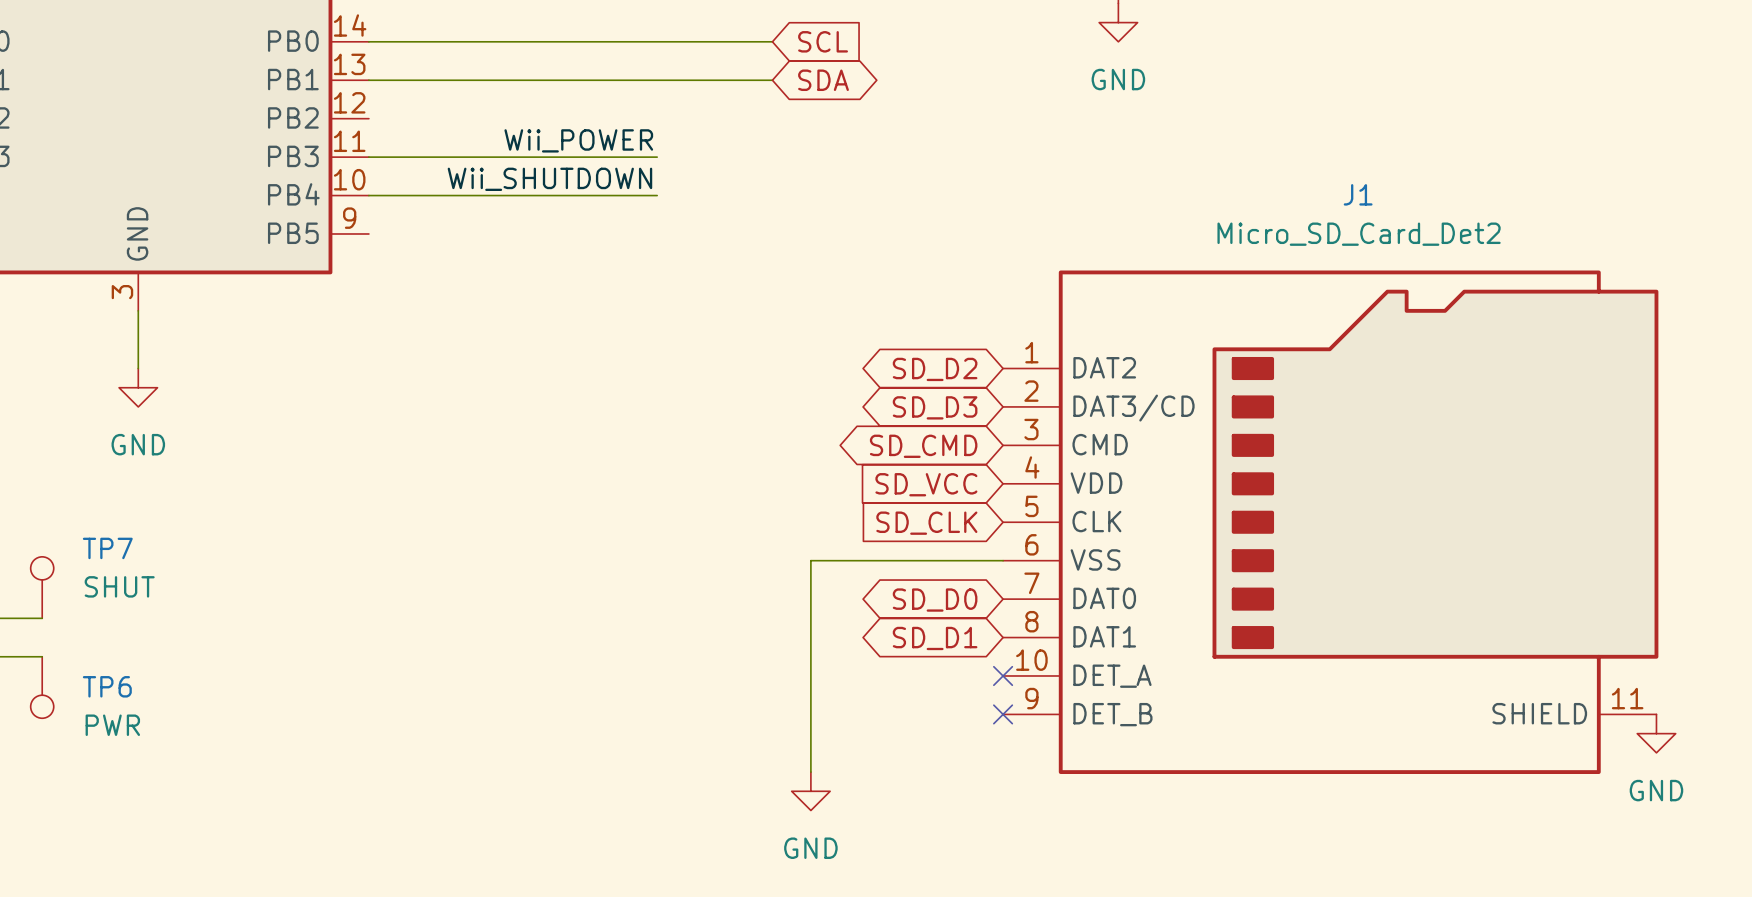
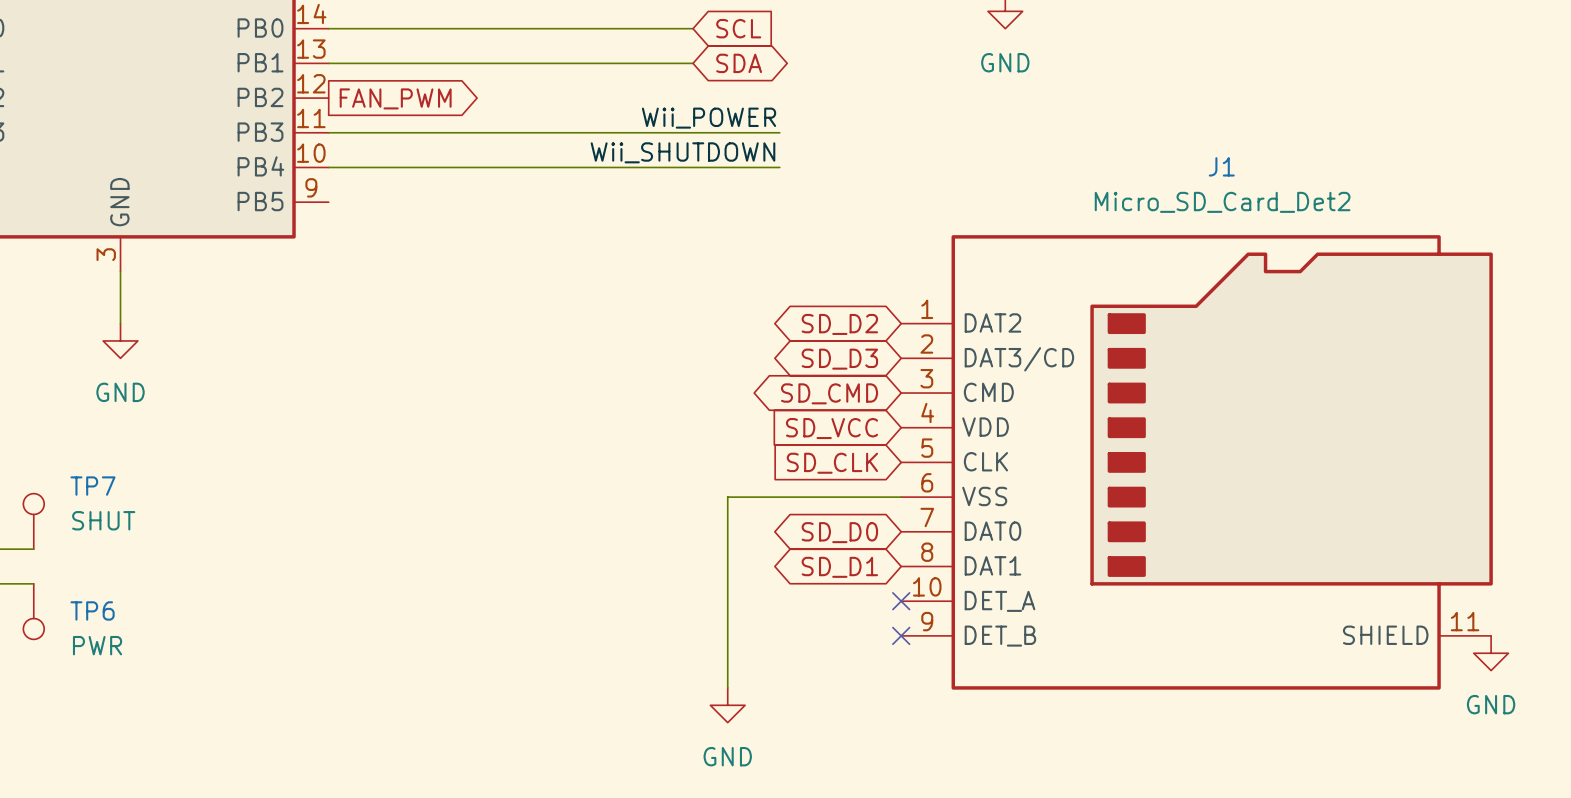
global label: none -> FAN_PWM (395, 98)
label position: Wii_POWER (578, 140) -> Wii_POWER (709, 118)
wire: none -> (588, 132) (779, 132)
label position: Wii_SHUTDOWN (549, 179) -> Wii_SHUTDOWN (682, 152)
wire: none -> (588, 167) (779, 167)

